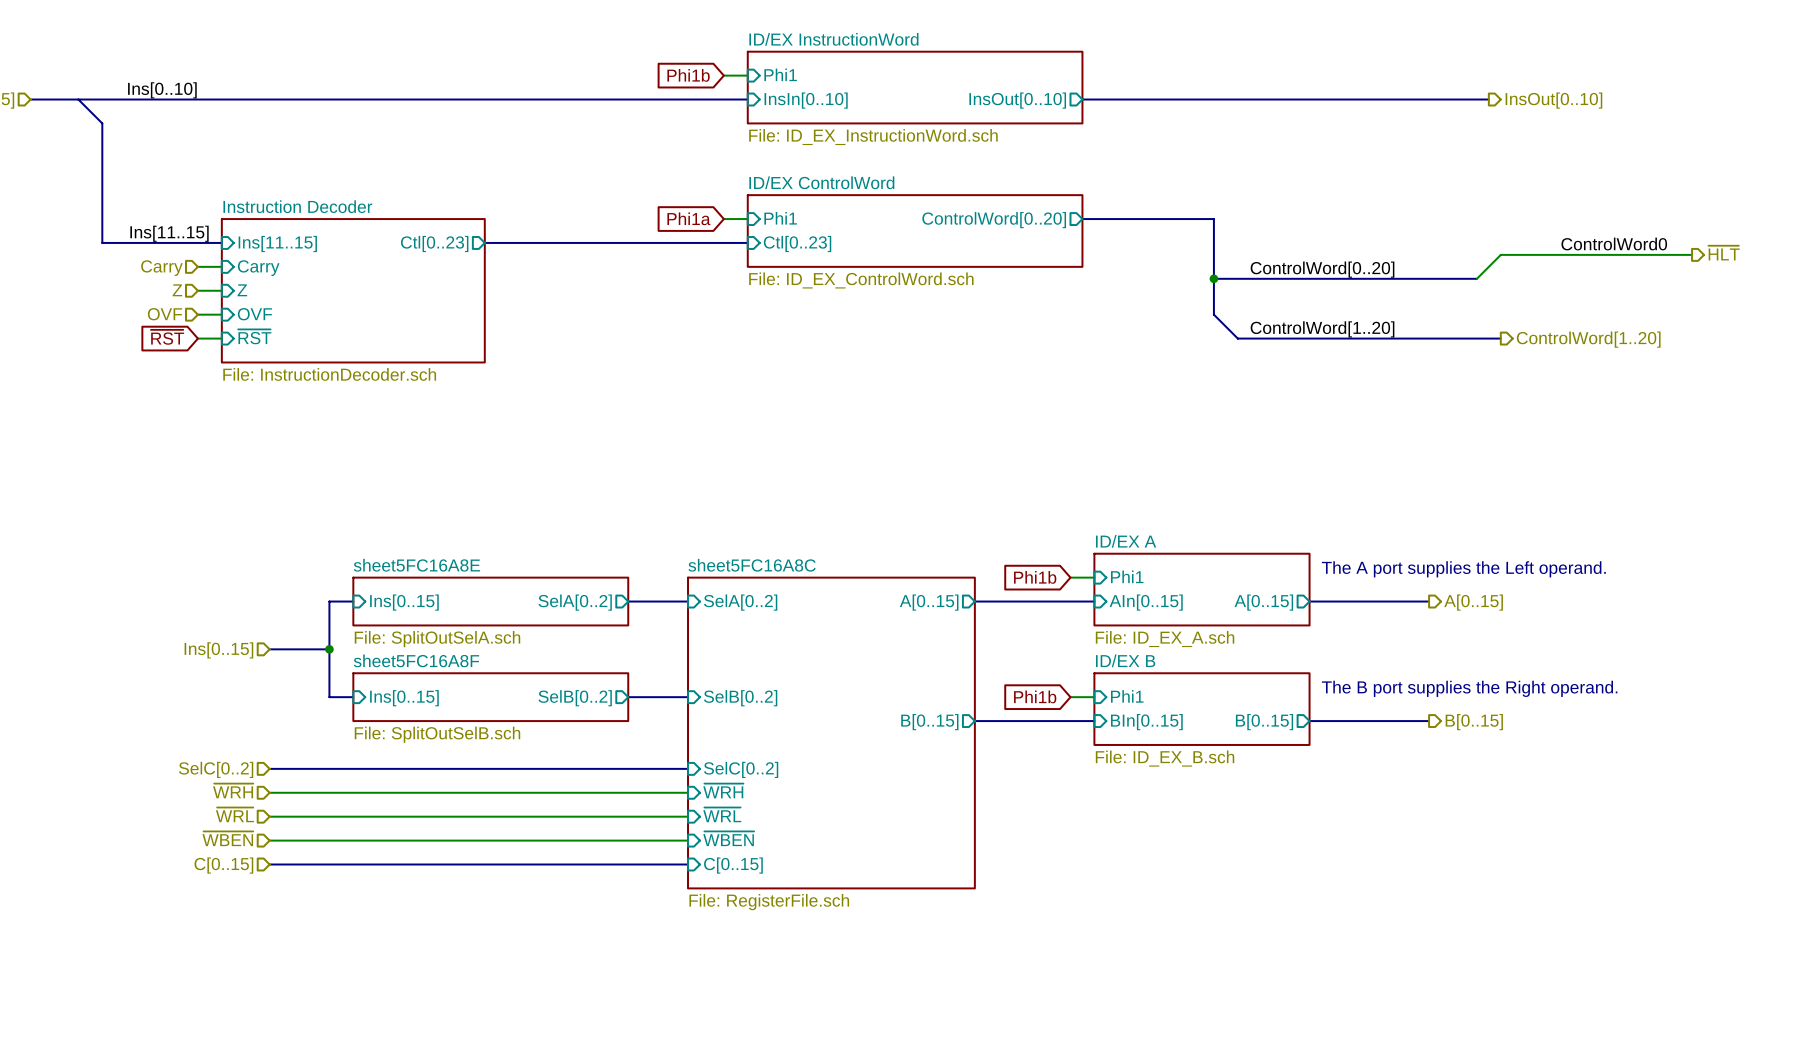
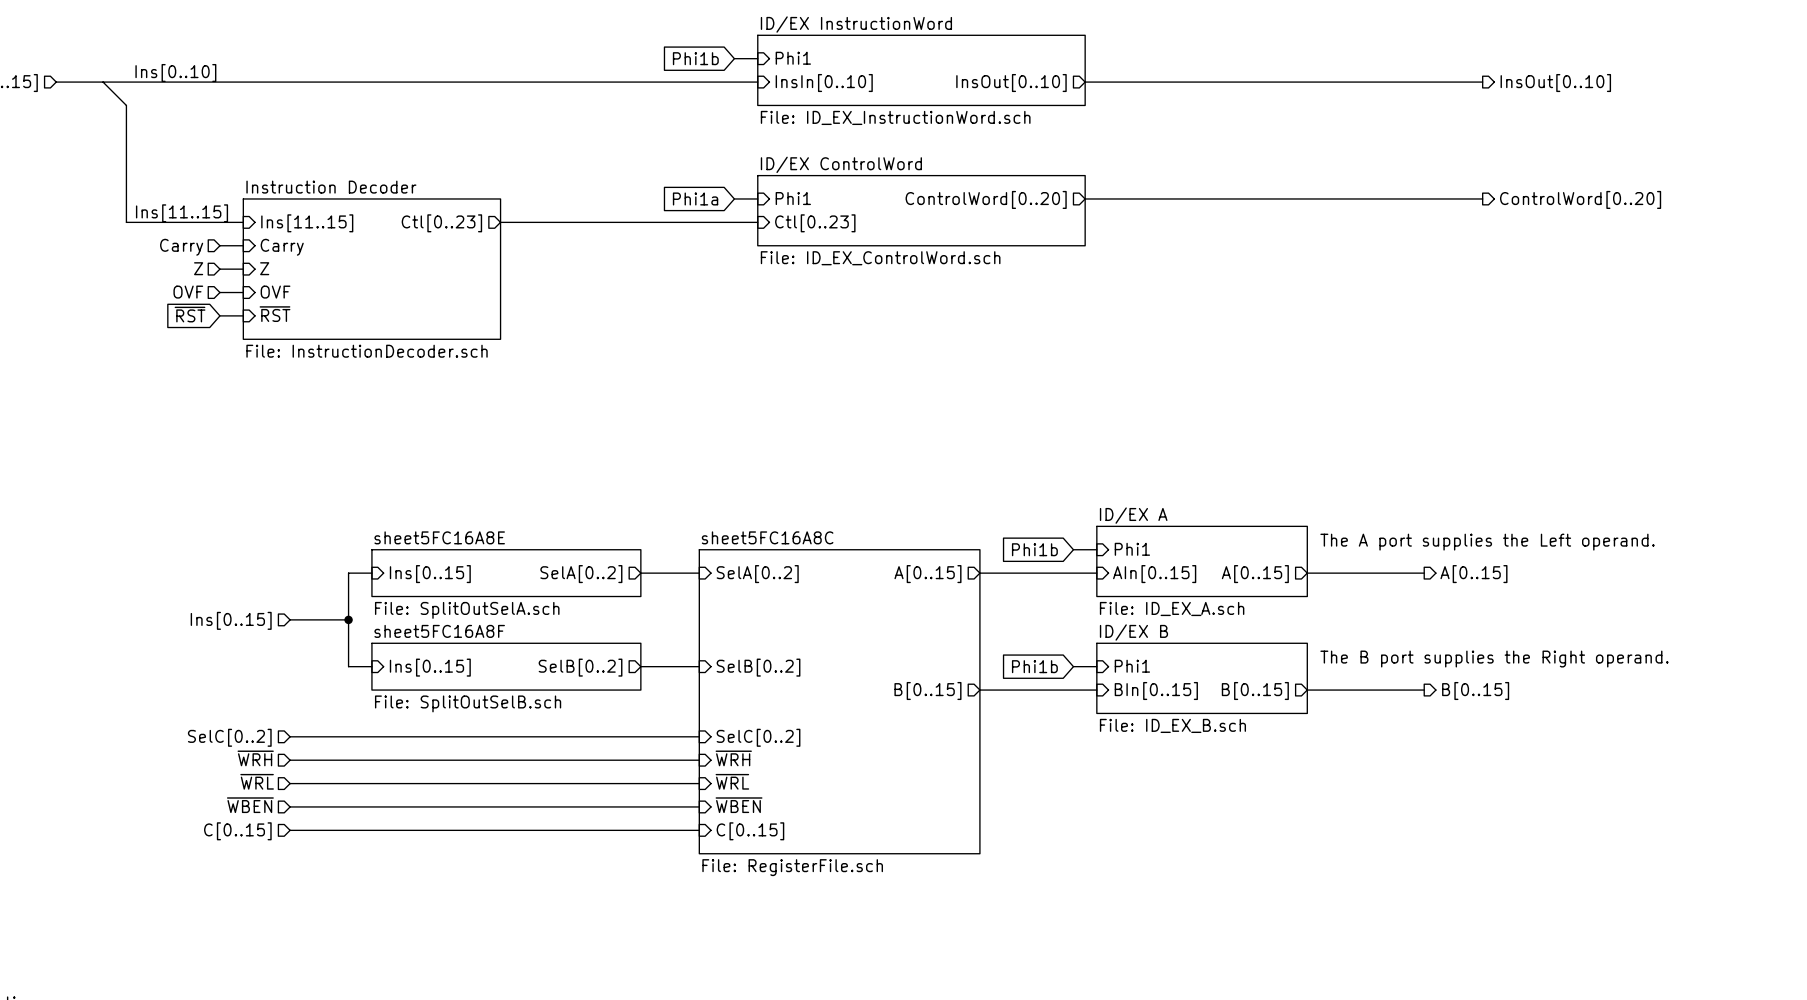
bus: (1213, 219) (1213, 314) (1237, 338) (1500, 338) -> (1213, 198) (1482, 198)
hierarchical label: none -> ControlWord[0..20] (1580, 199)
label: ControlWord0 (1614, 244) -> none
hierarchical label: ~{HLT} (1724, 253) -> none
wire: (1692, 254) (1500, 254) (1476, 278) -> none
label: ControlWord[0..20] (1322, 269) -> none
bus: (1213, 278) (1476, 278) -> none
junction: (1213, 278) -> none
label: ControlWord[1..20] (1322, 329) -> none
hierarchical label: ControlWord[1..20] (1588, 339) -> none

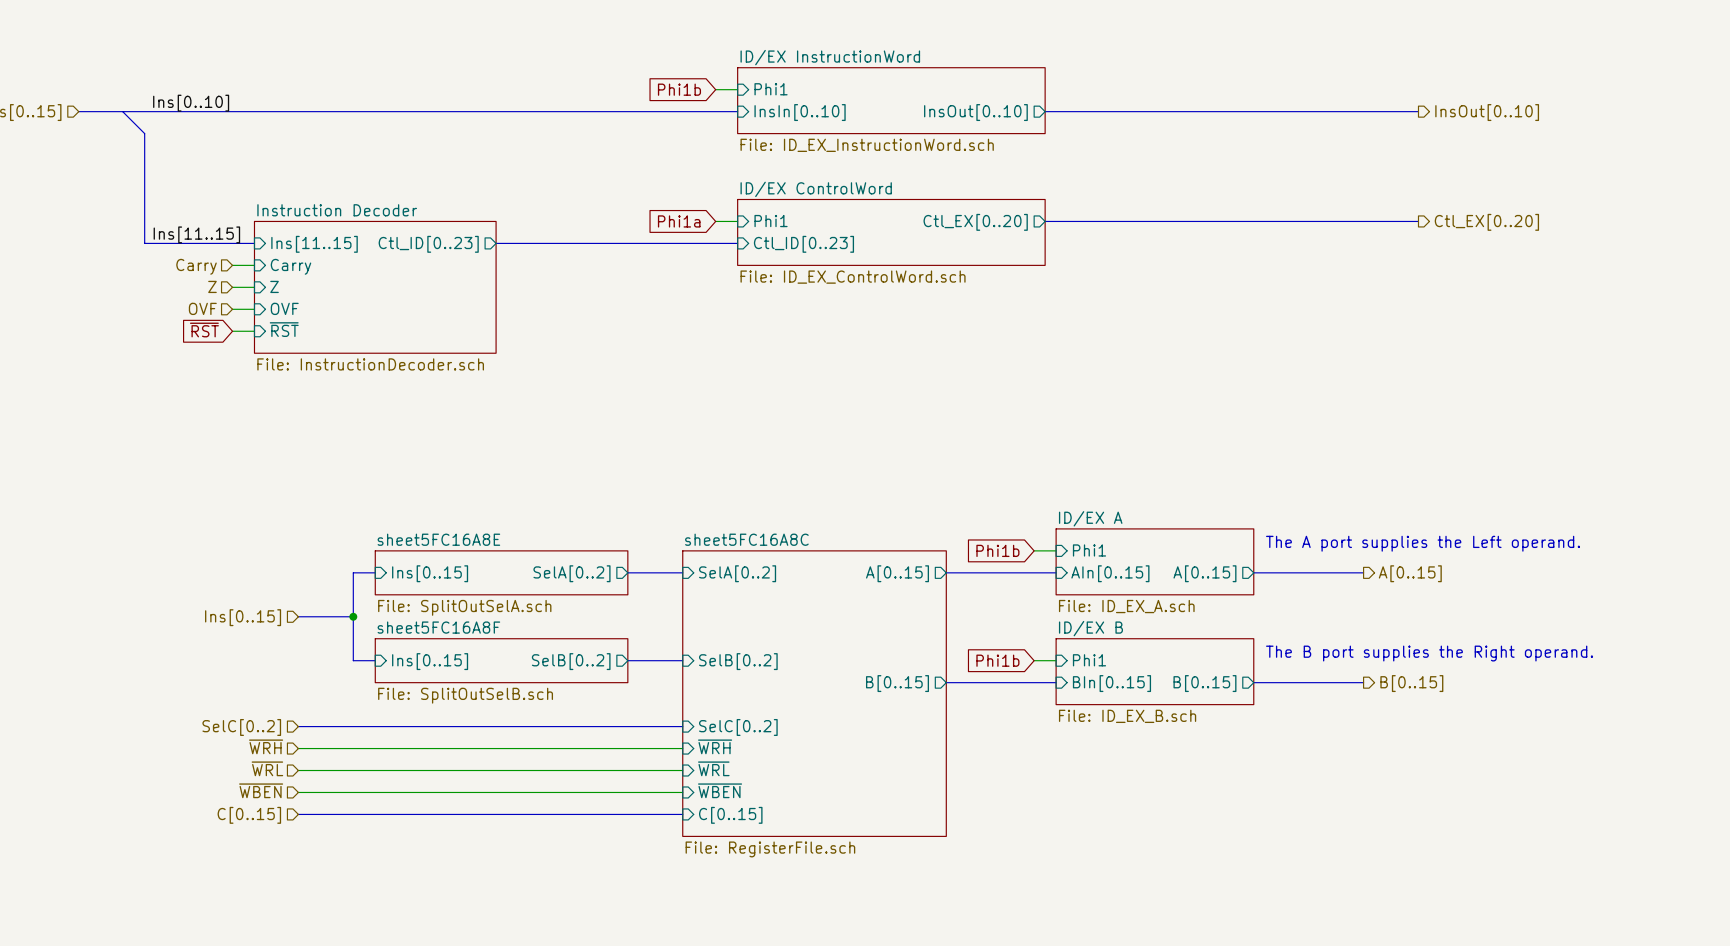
sheet pin: ControlWord[0..20] (986, 199) -> Ctl_EX[0..20] (975, 222)
hierarchical label: ControlWord[0..20] (1580, 199) -> Ctl_EX[0..20] (1486, 222)
sheet pin: Ctl[0..23] (441, 223) -> Ctl_ID[0..23] (428, 244)
sheet pin: Ctl[0..23] (815, 223) -> Ctl_ID[0..23] (803, 244)

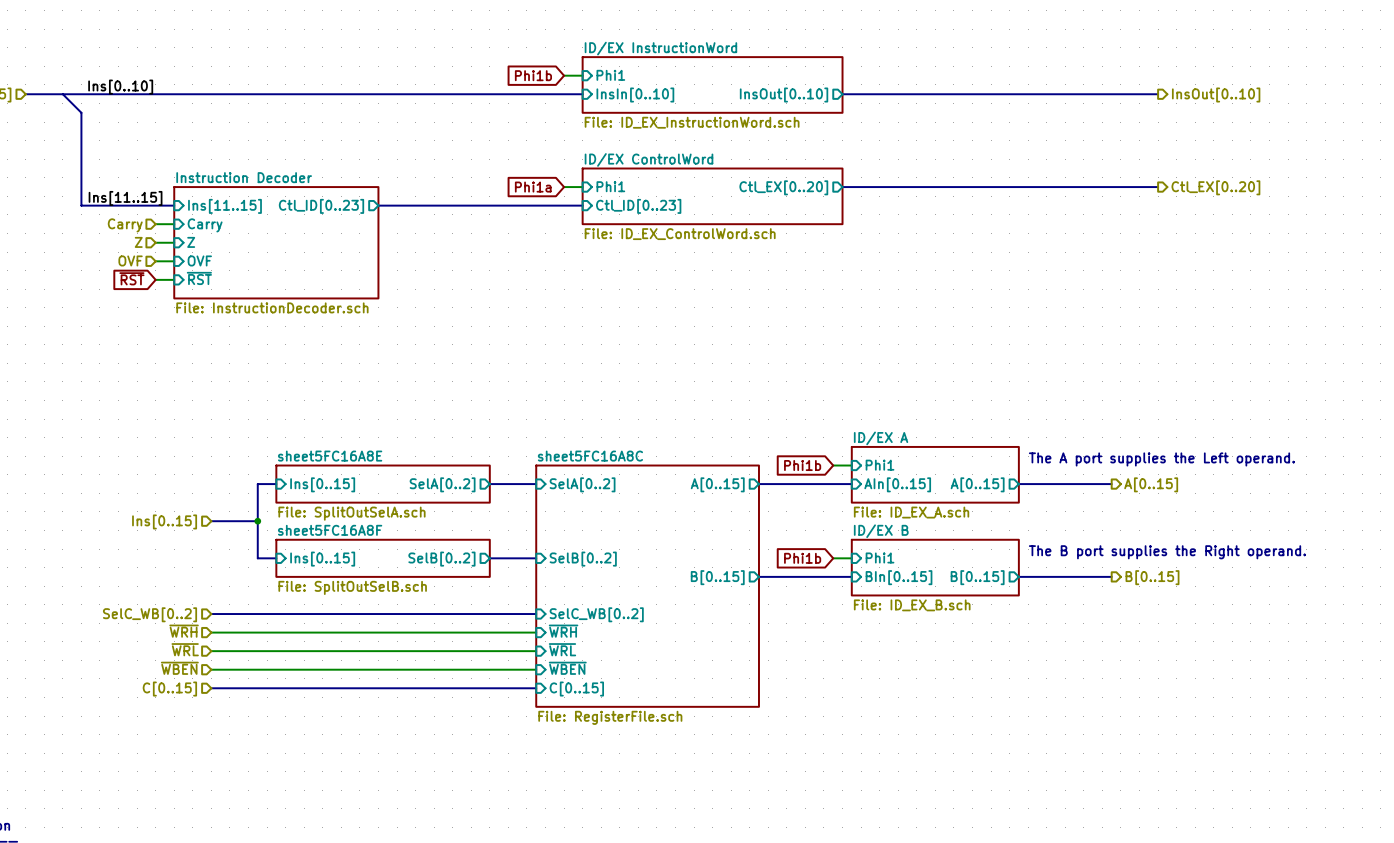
hierarchical label: SelC[0..2] (241, 727) -> SelC_WB[0..2] (150, 614)
sheet pin: SelC[0..2] (738, 727) -> SelC_WB[0..2] (596, 614)

